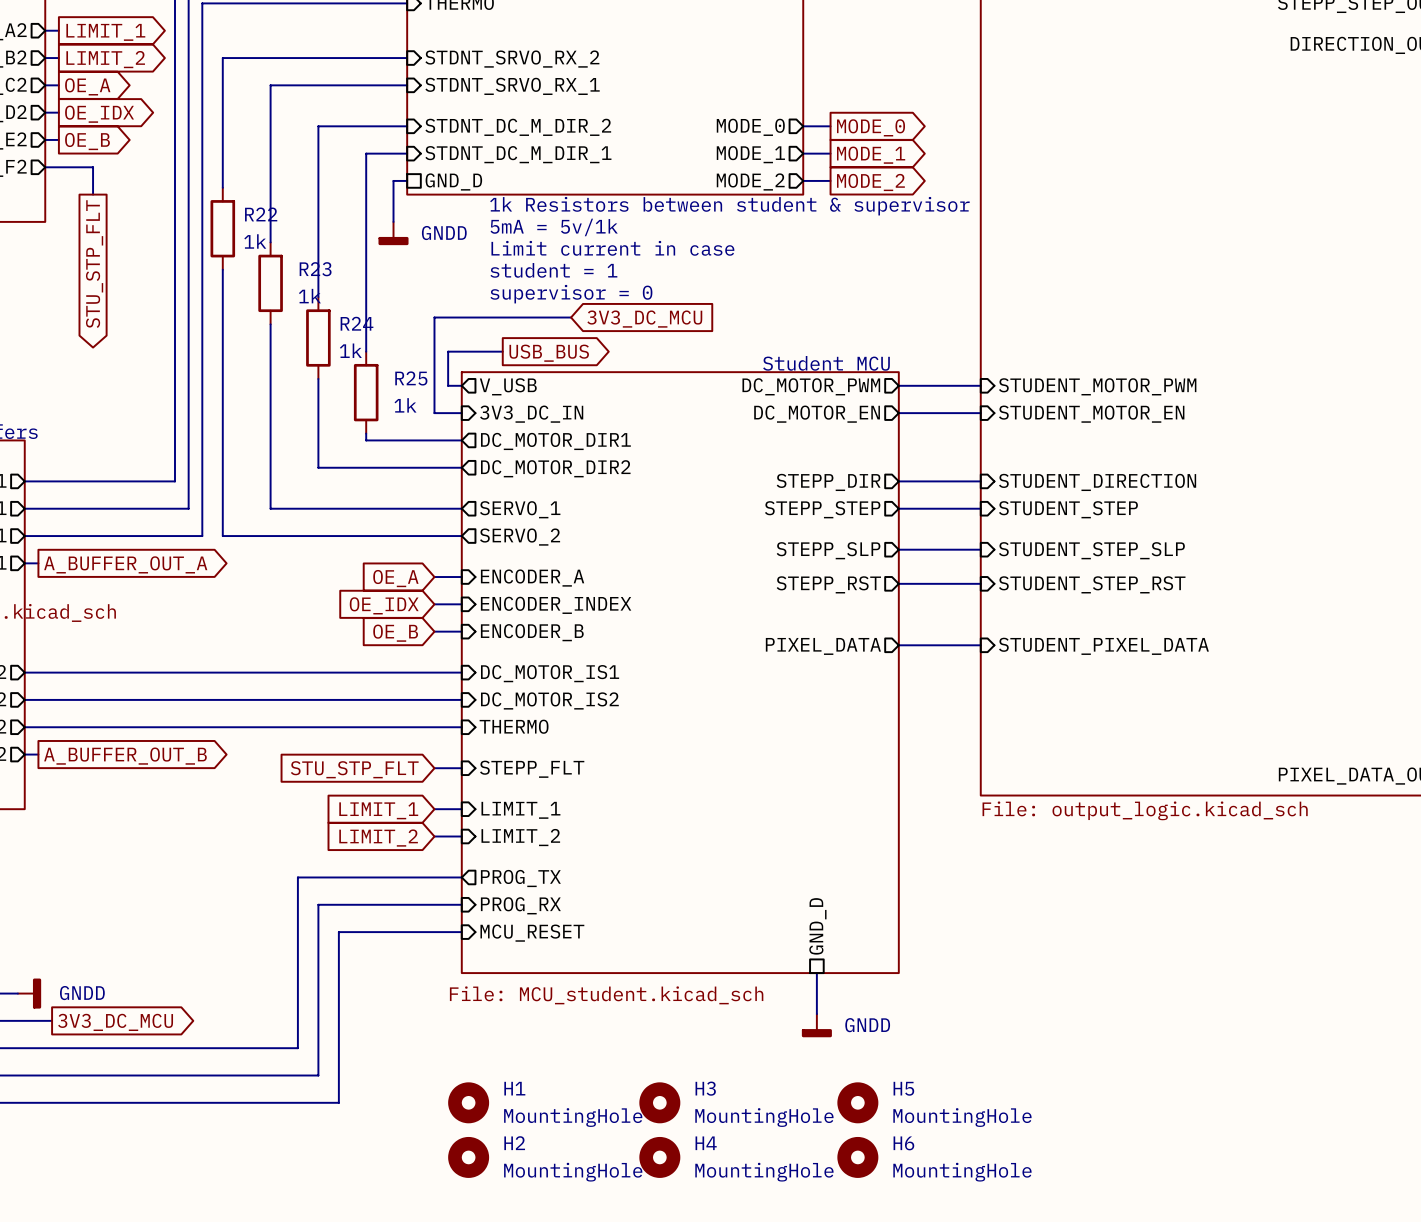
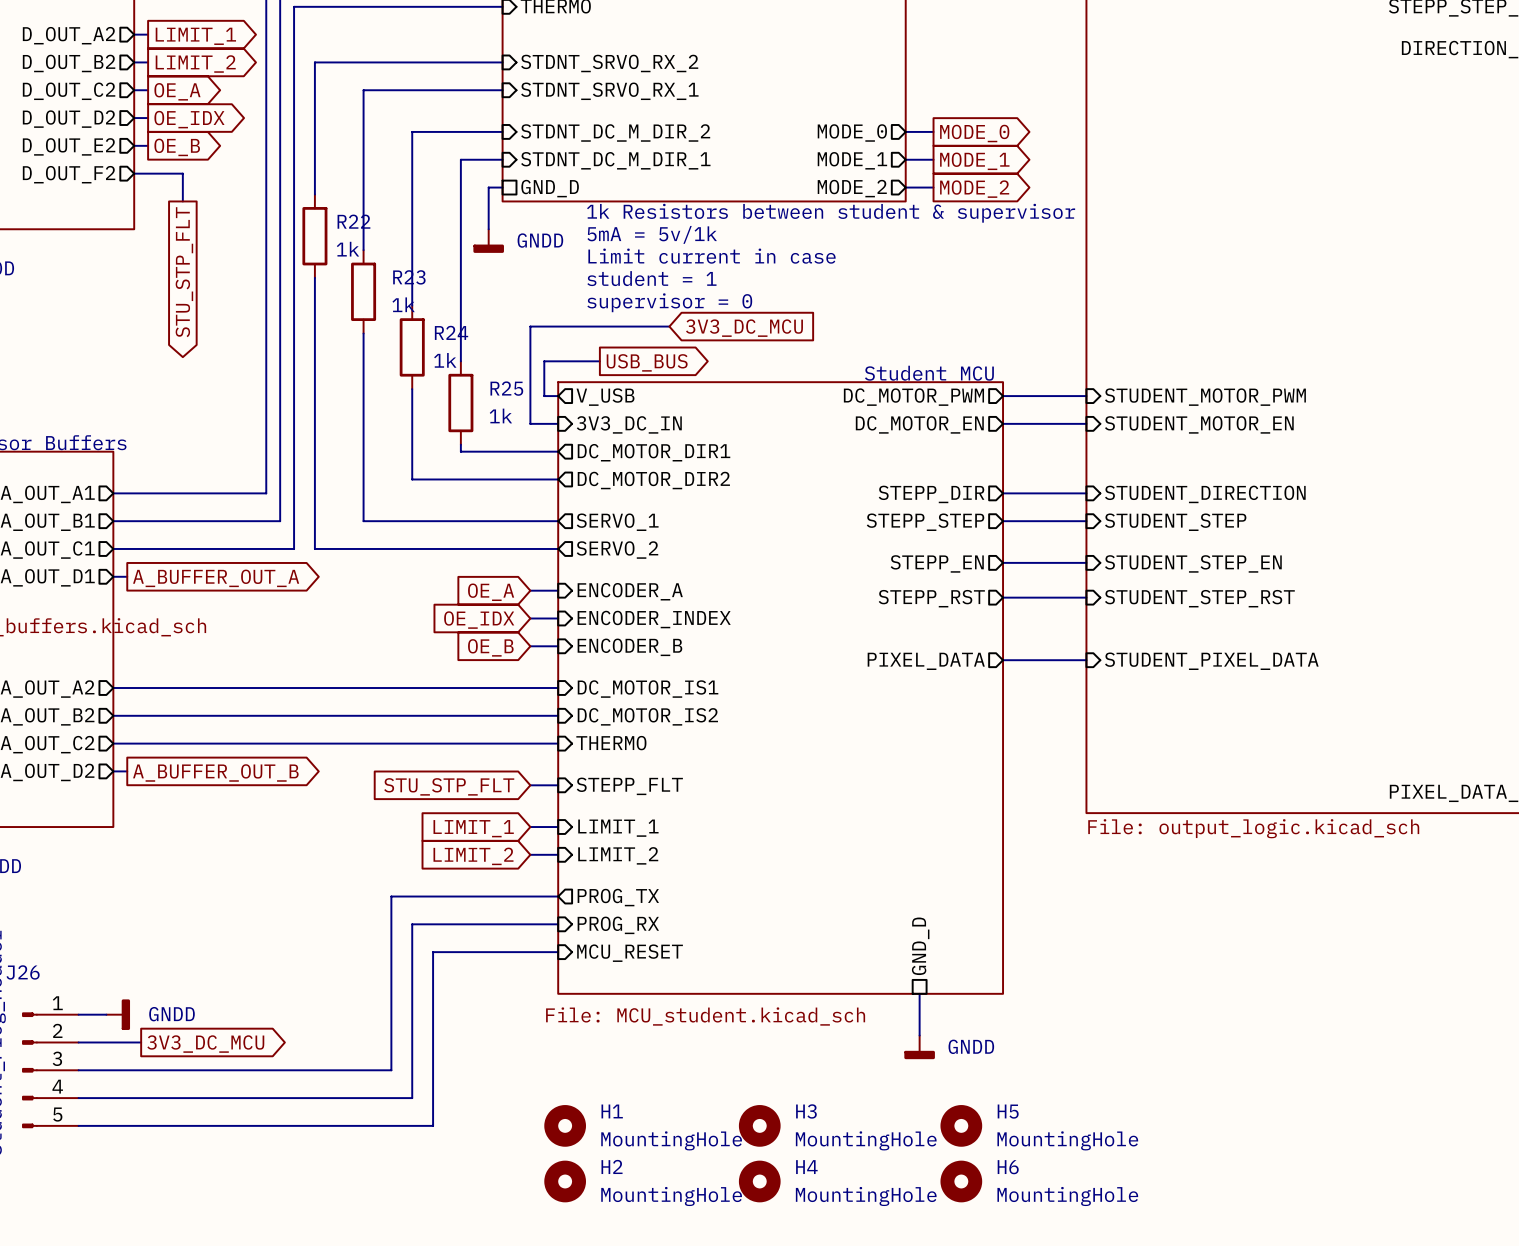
sheet pin: STEPP_SLP (828, 550) -> STEPP_EN (937, 563)
sheet pin: STUDENT_STEP_SLP (1091, 550) -> STUDENT_STEP_EN (1193, 563)

